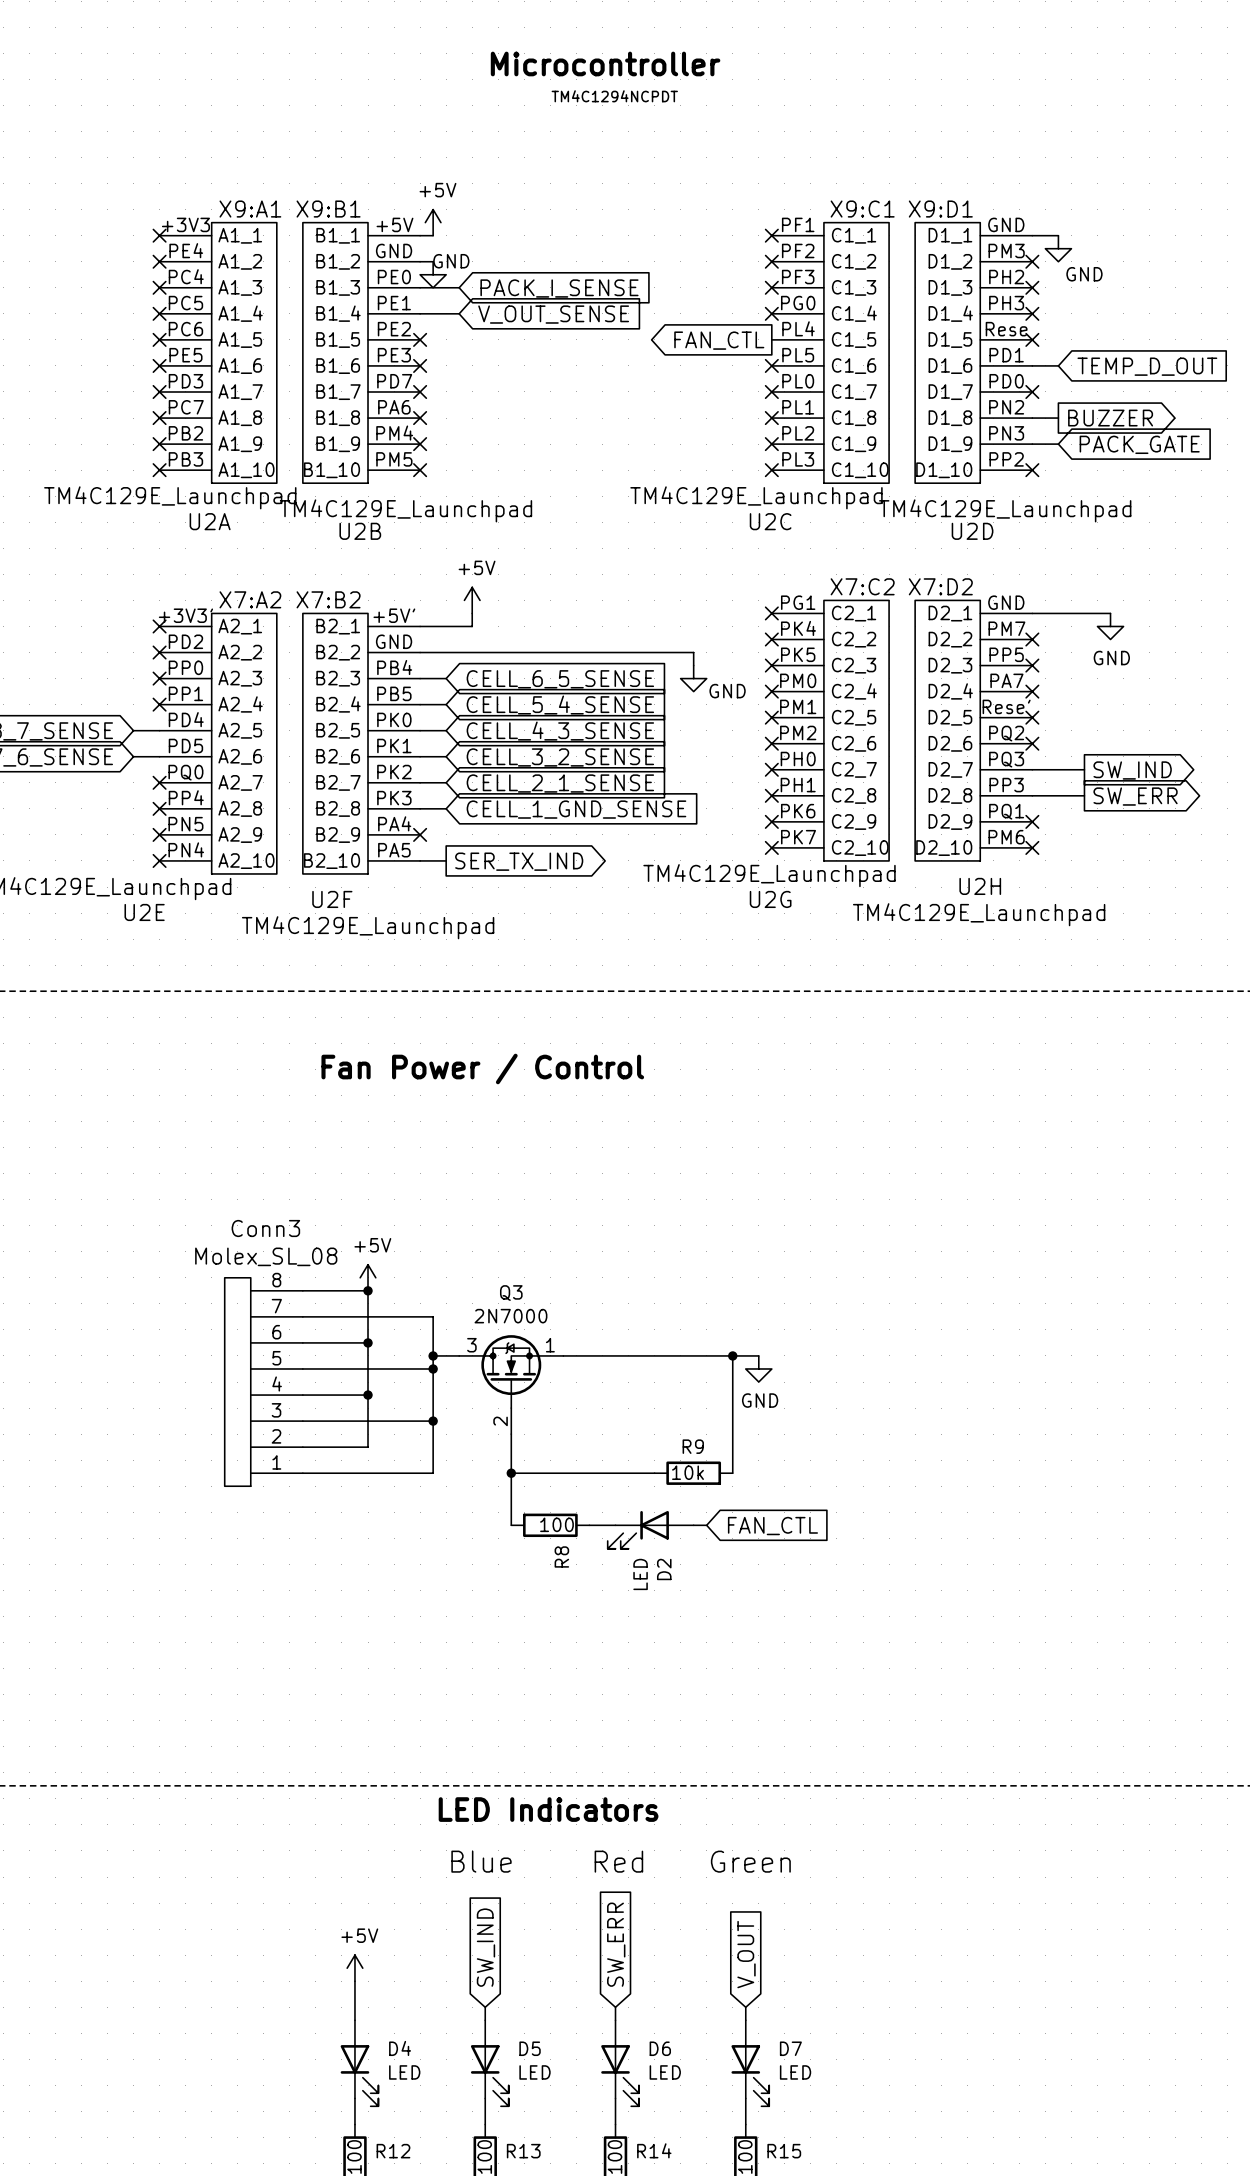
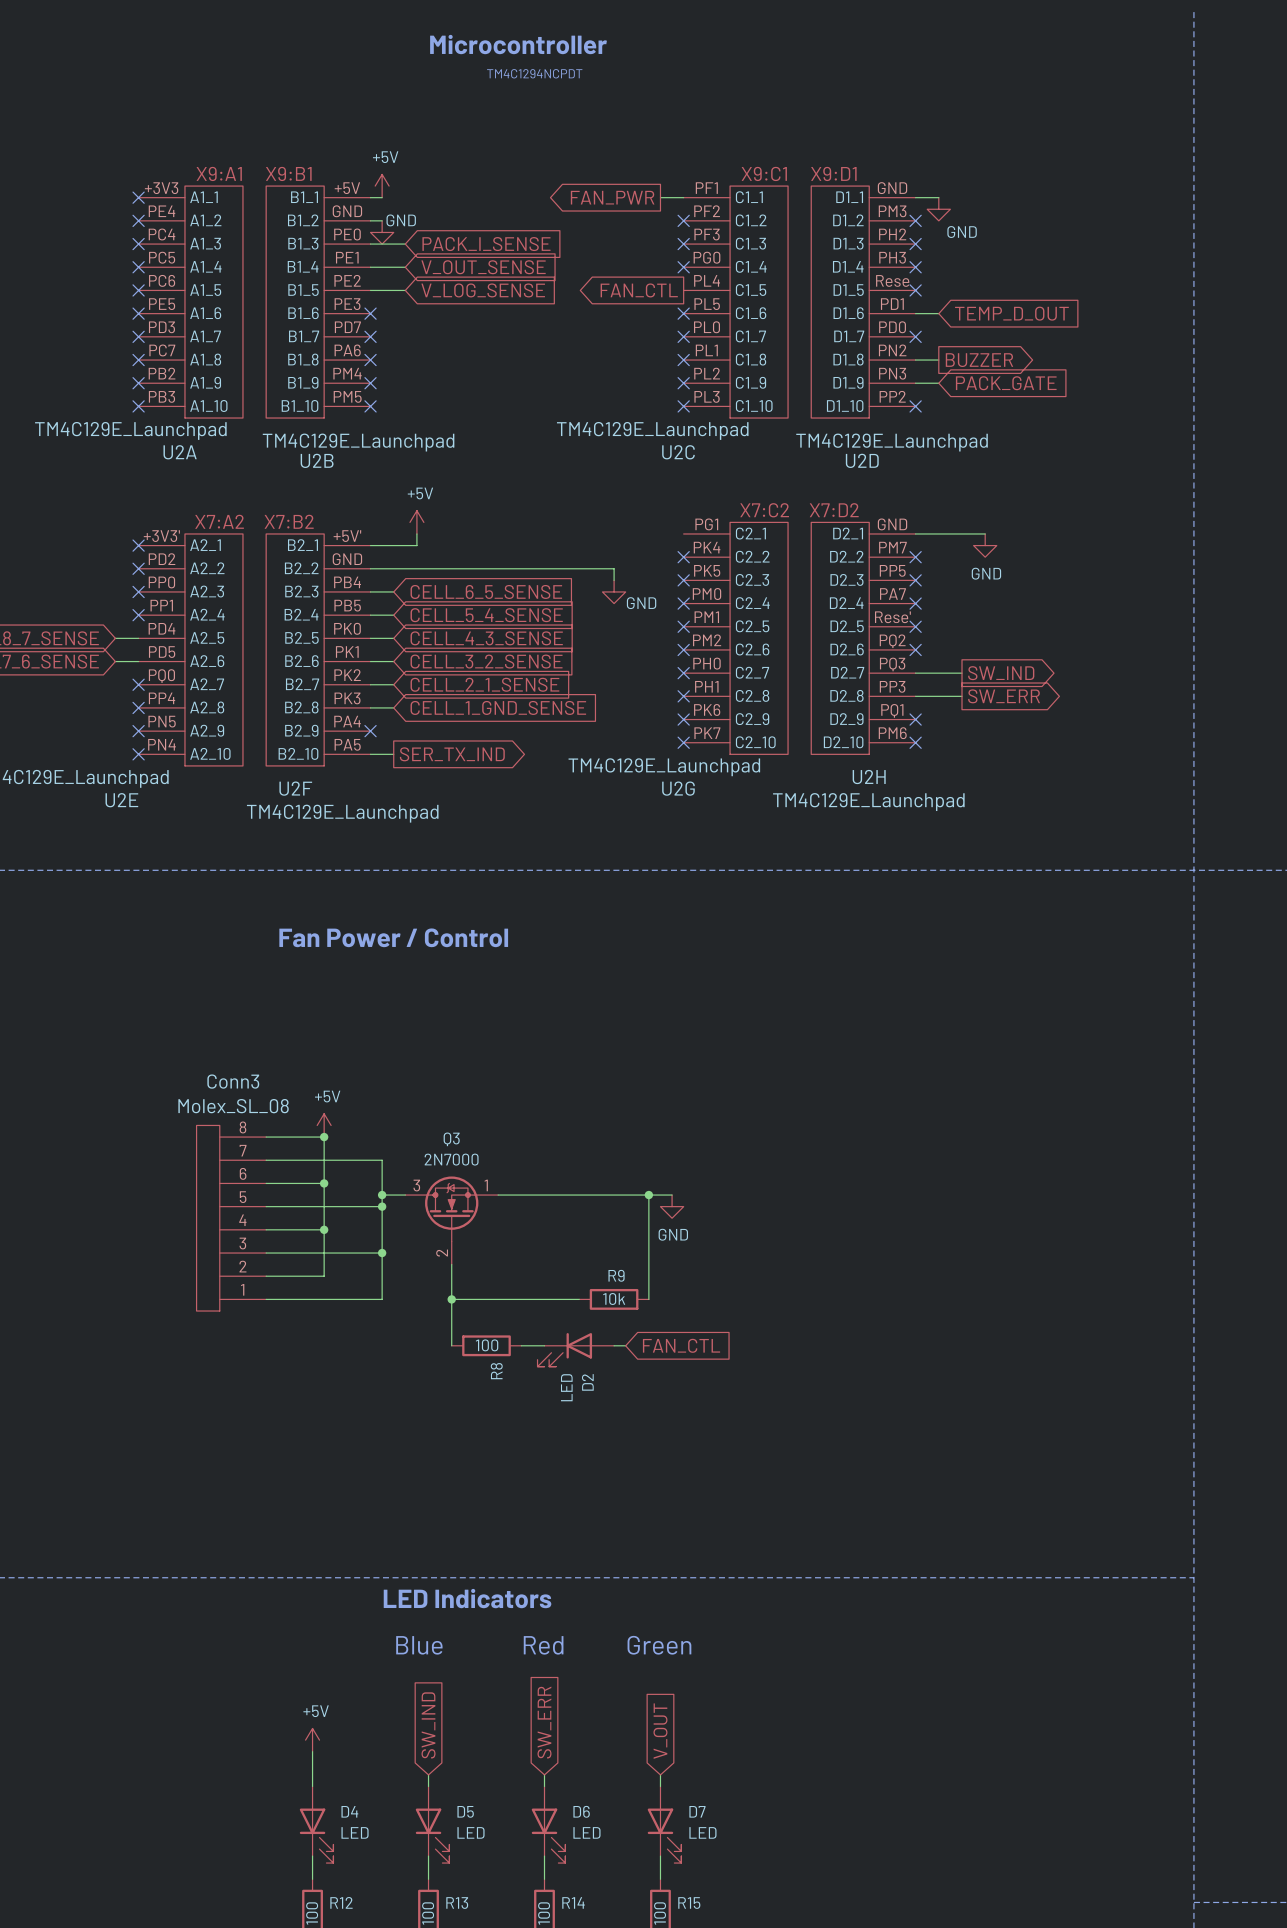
wire: none -> (660, 197) (683, 197)
no-connect mark: (771, 235) -> none
global label: none -> FAN_PWR (612, 197)
wire: none -> (370, 290) (405, 290)
no-connect mark: (420, 339) -> none
global label: none -> V_LOG_SENSE (483, 290)
no-connect mark: (771, 613) -> none

